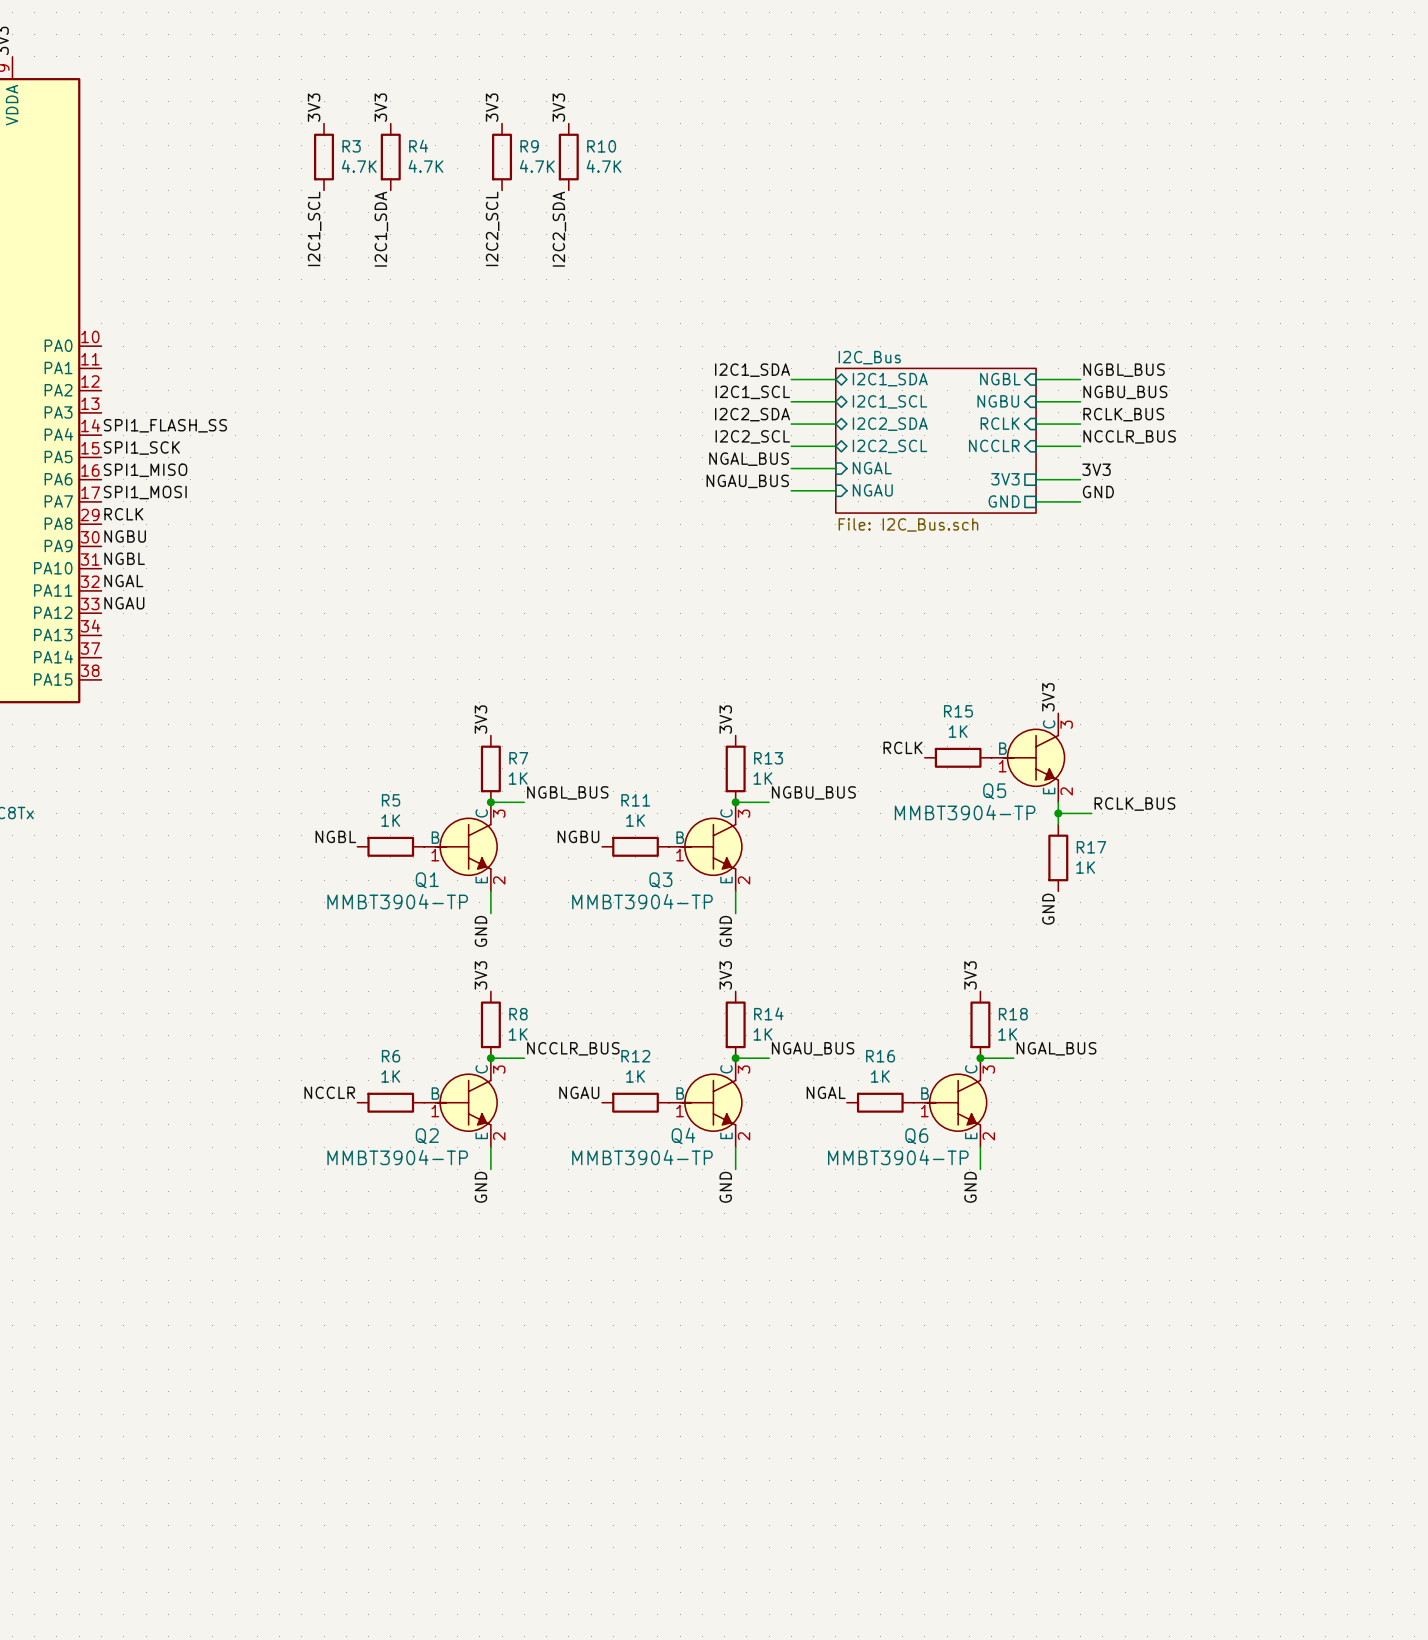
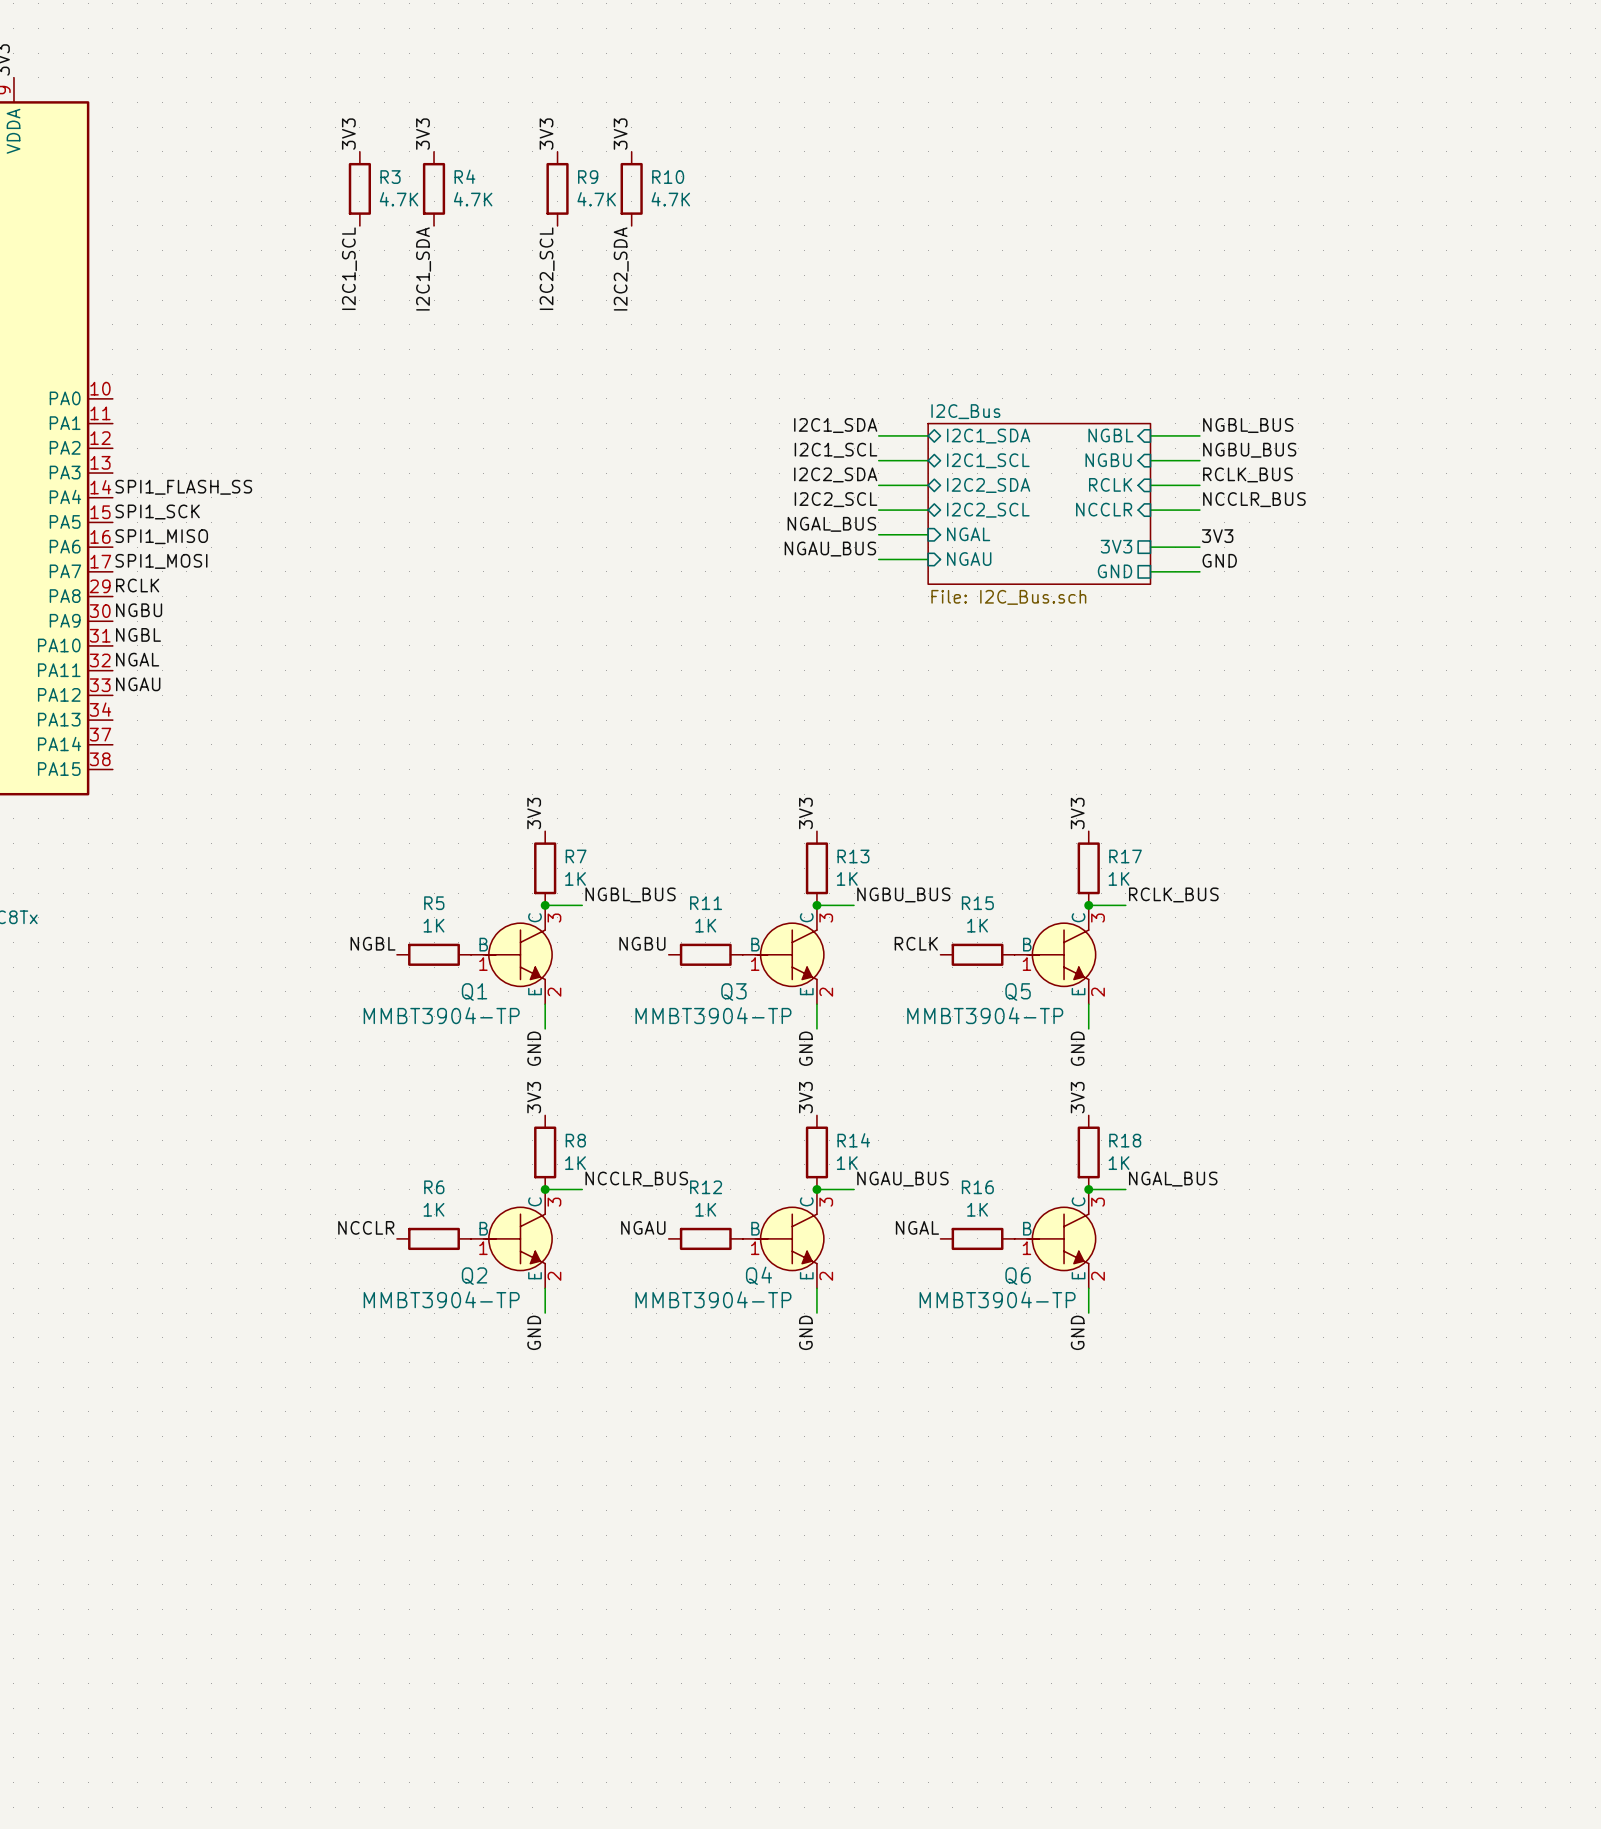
label position: 3V3 (1048, 697) -> 3V3 (1077, 813)
label position: RCLK (902, 747) -> RCLK (916, 943)
R15 position: (958, 757) -> (977, 954)
Q5 position: (1028, 757) -> (1055, 954)
junction: none -> (1088, 905)
wire: (1058, 802) (1058, 824) -> (1088, 1004) (1088, 1028)
label position: RCLK_BUS (1134, 804) -> RCLK_BUS (1173, 894)
wire: (1058, 813) (1091, 813) -> (1088, 905) (1125, 905)
junction: (1058, 813) -> none
R17 position: (1058, 857) -> (1088, 868)
label position: GND (1048, 909) -> GND (1077, 1048)

